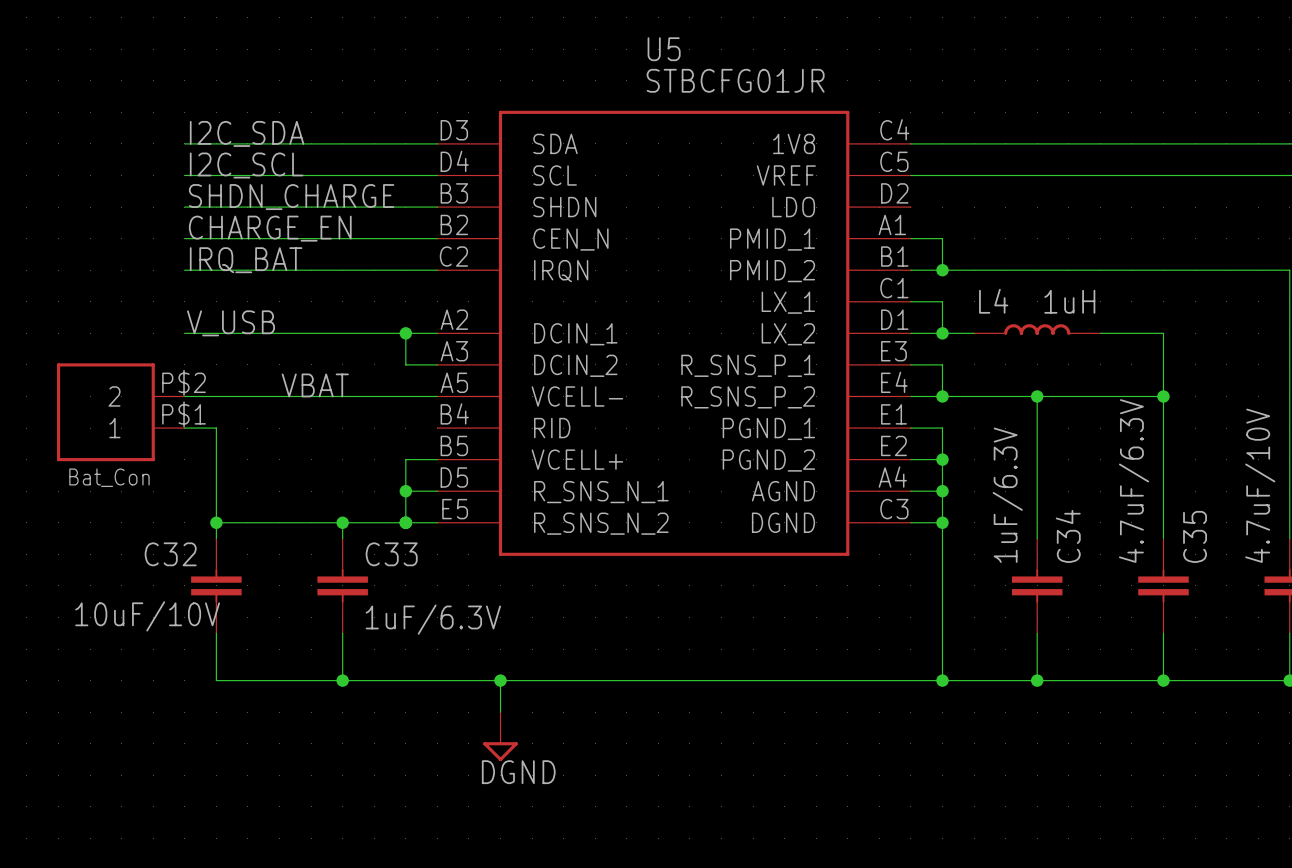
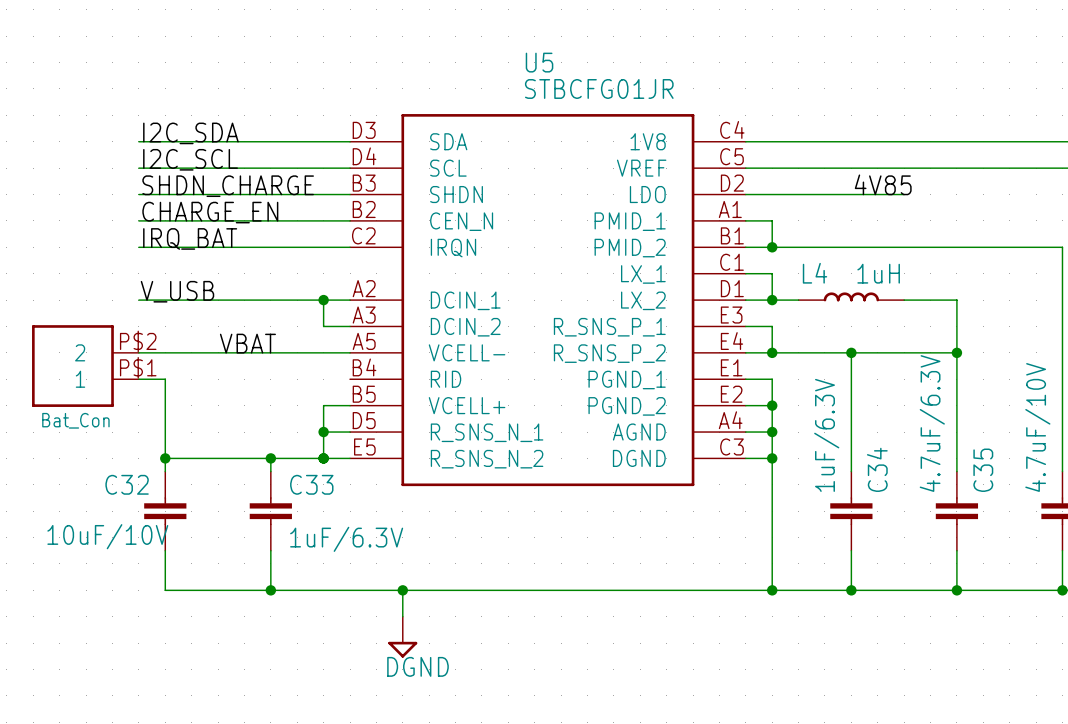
label: none -> 4V85 (883, 184)
wire: none -> (745, 194) (904, 194)

